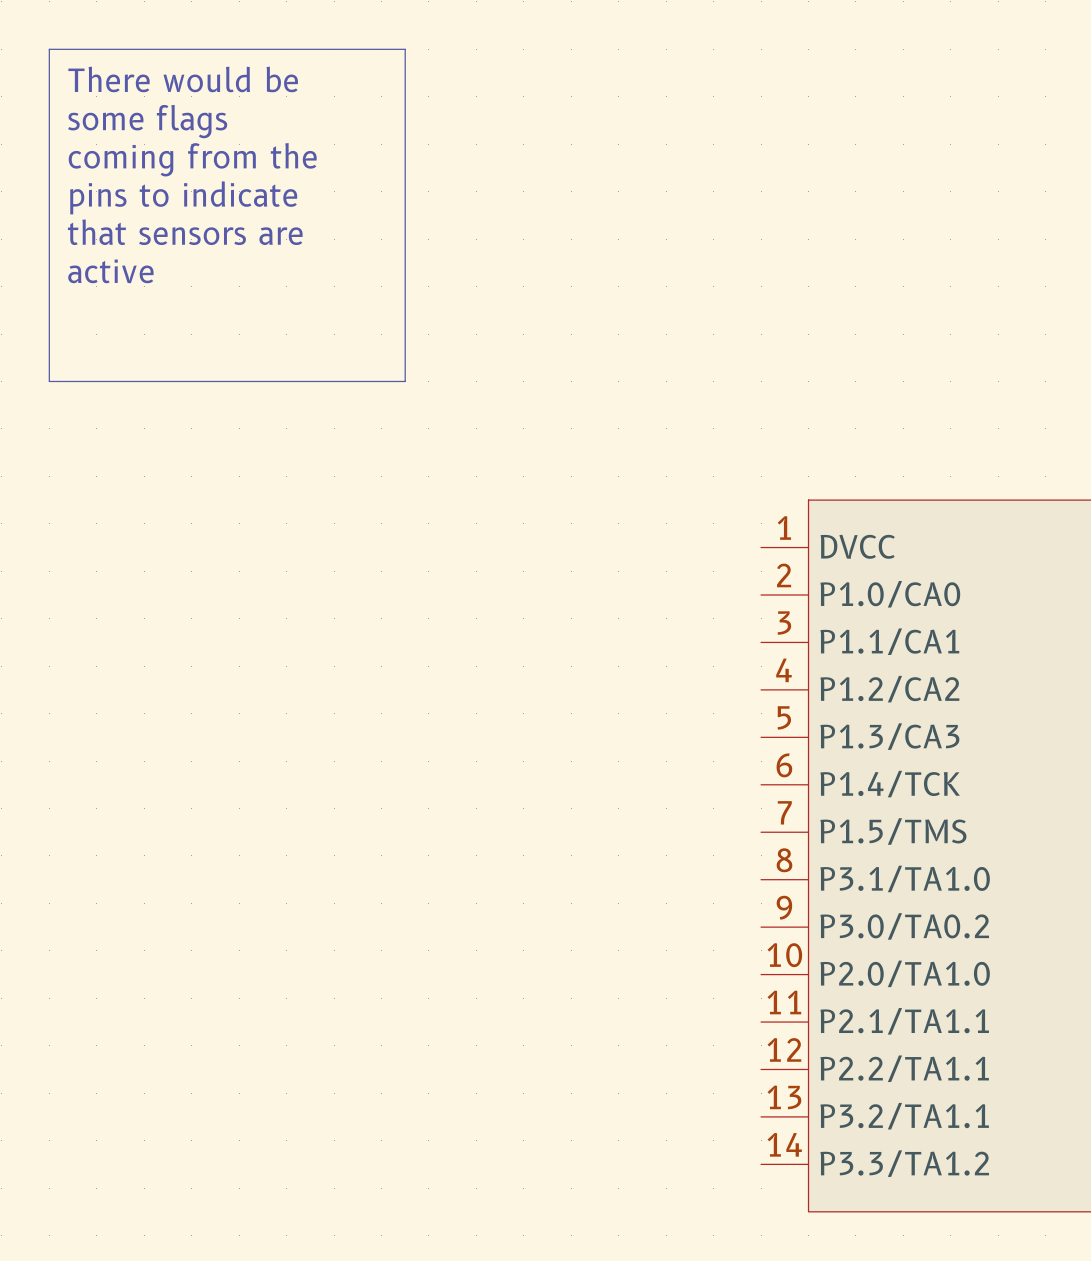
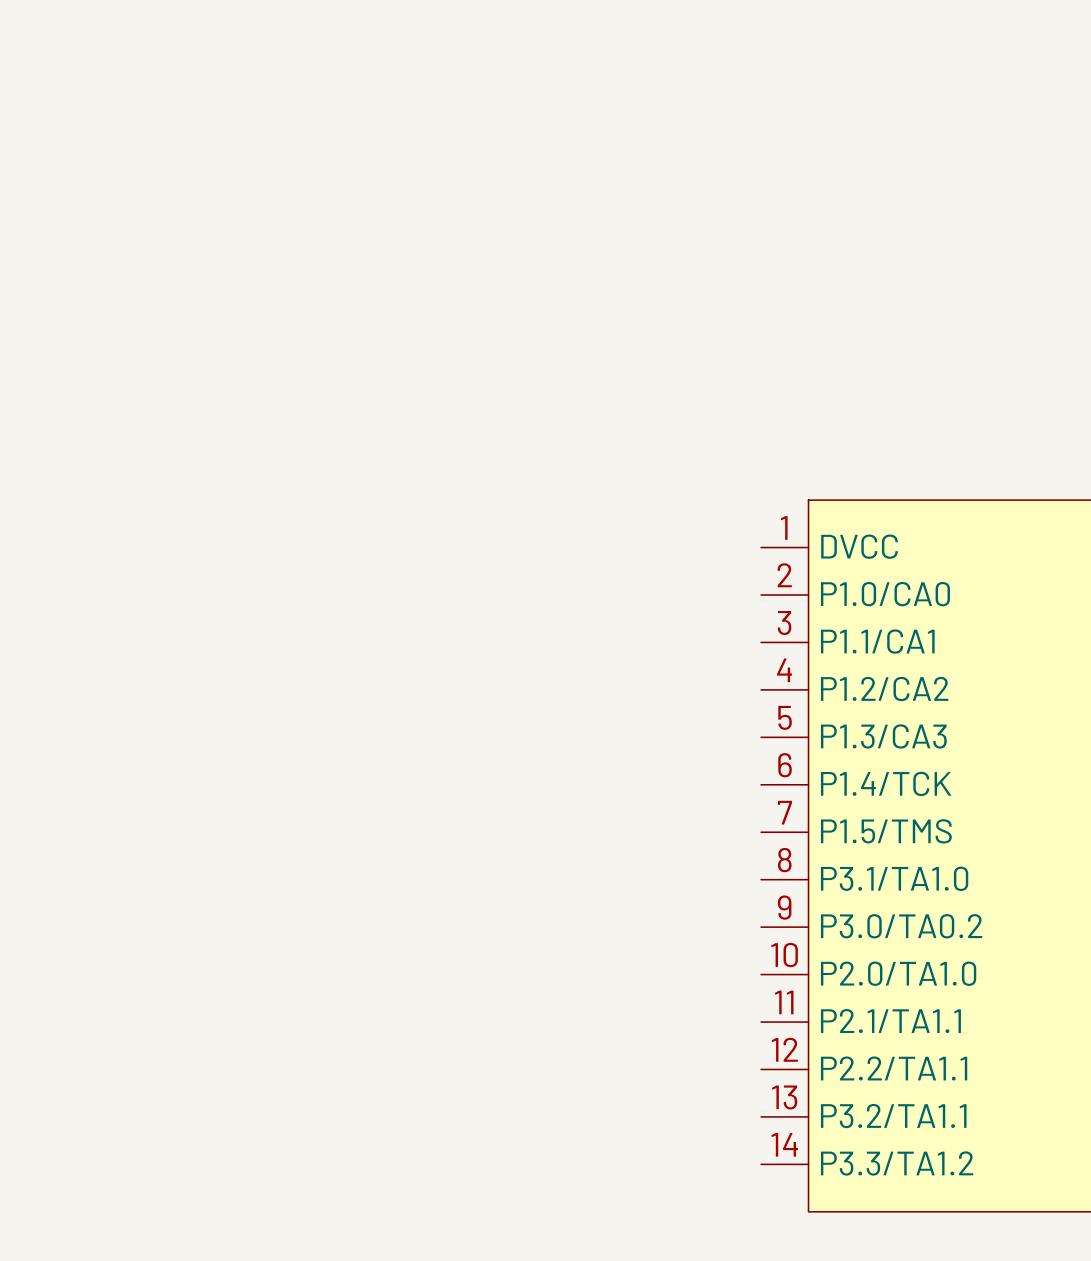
line: (49, 49) (405, 49) (405, 381) (49, 381) (49, 49) -> none
text: There would be (183, 79) -> none
text: some flags (147, 121) -> none
text: coming from the (192, 159) -> none
text: pins to indicate (183, 197) -> none
text: that sensors are (185, 232) -> none
text: active (110, 271) -> none

